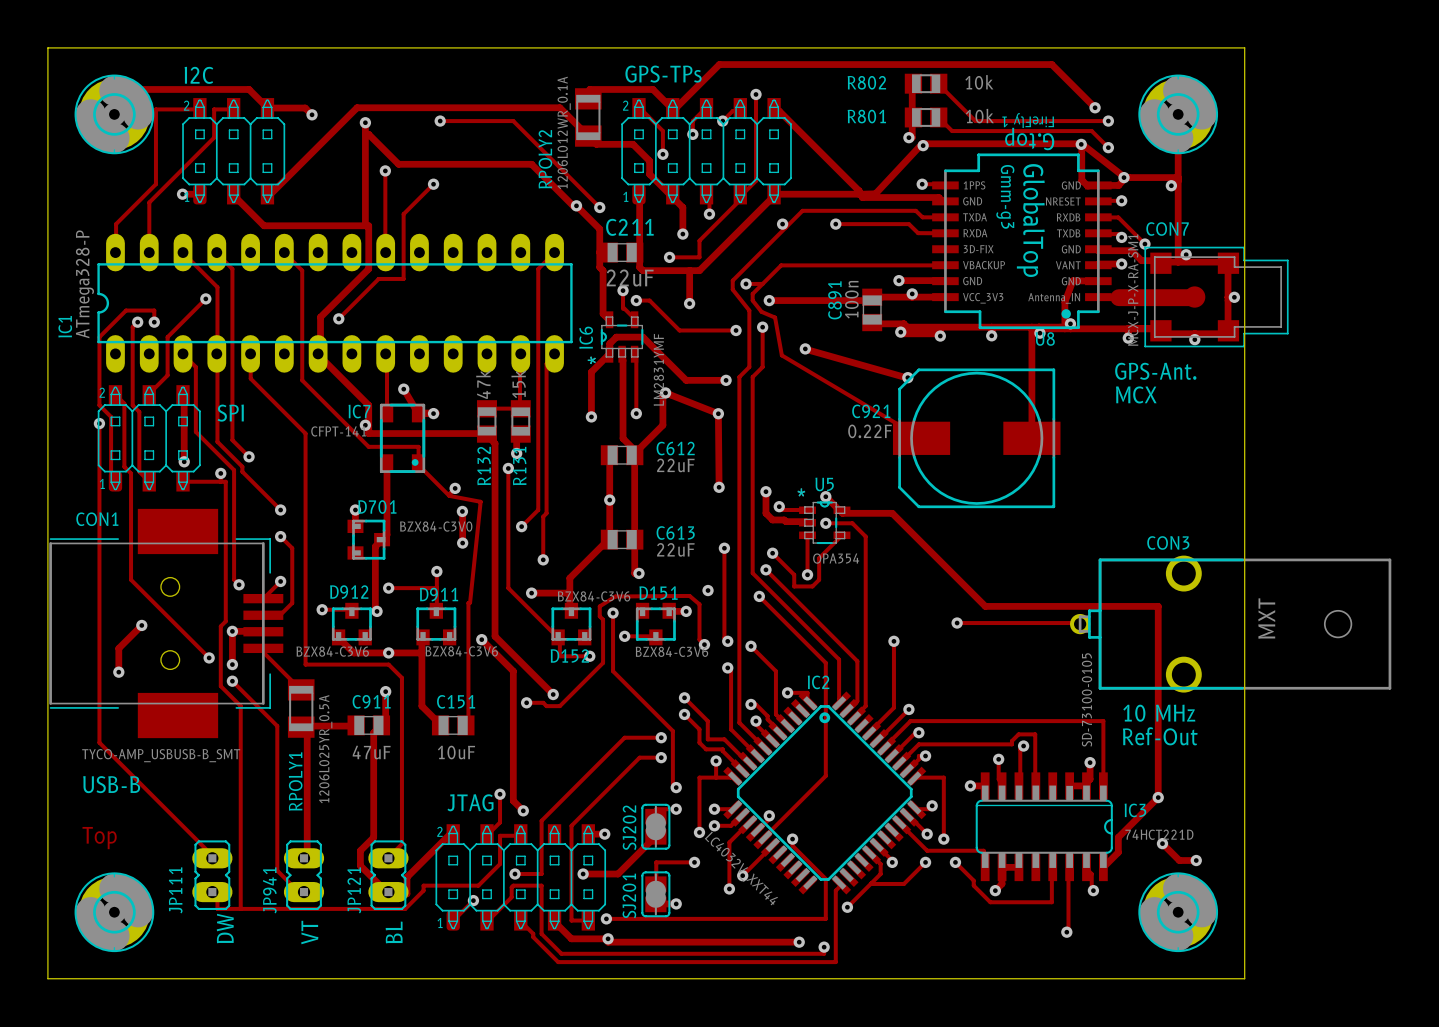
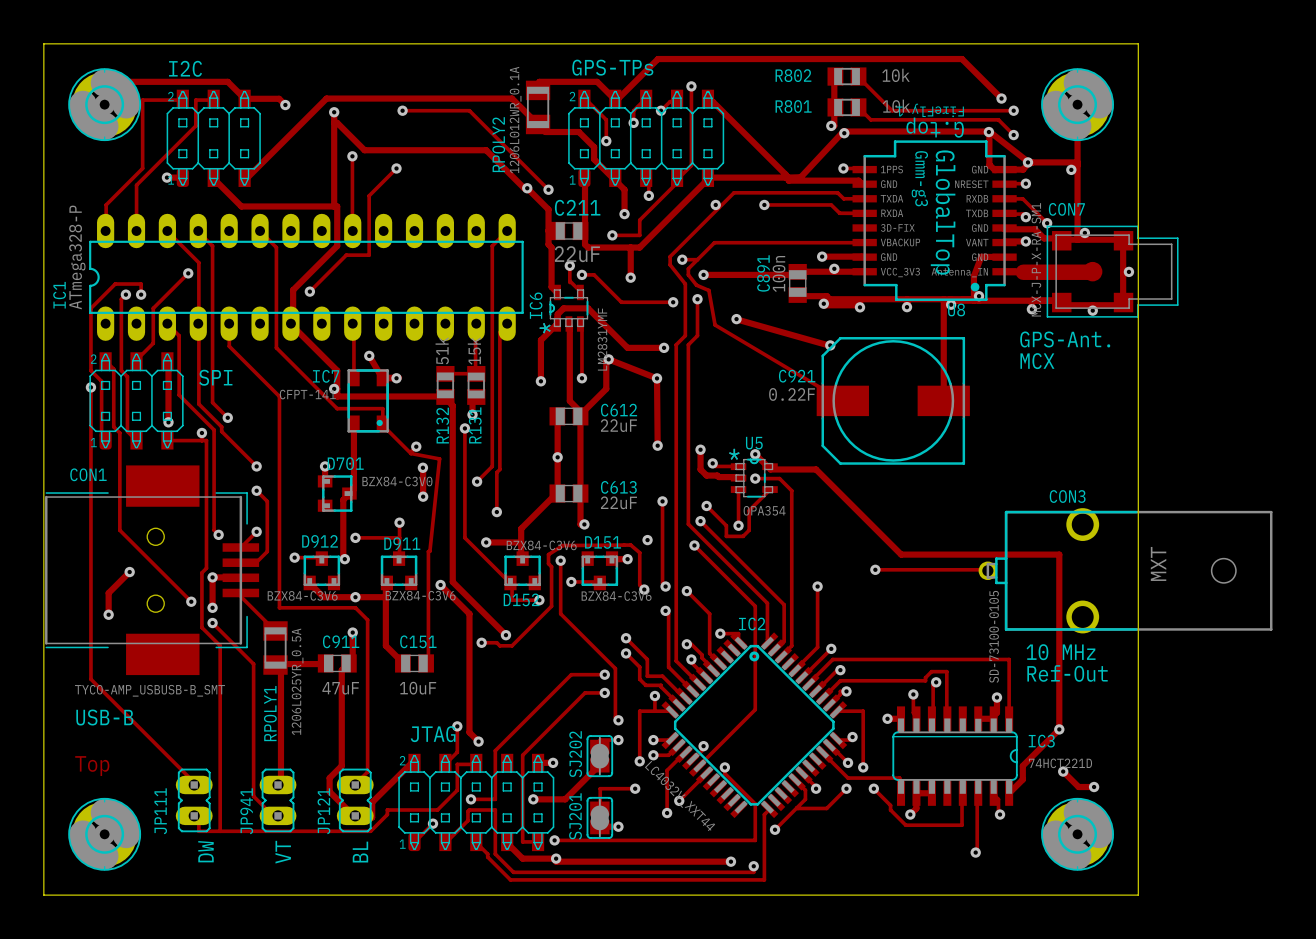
R132 value: 47k (483, 384) -> 51k (442, 350)

